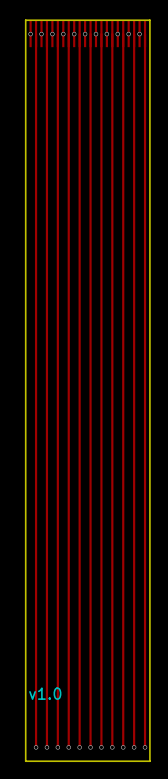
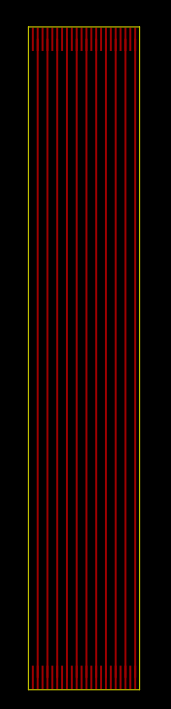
via: (30, 34) -> none
via: (41, 34) -> none
via: (52, 34) -> none
via: (63, 34) -> none
via: (74, 34) -> none
via: (85, 34) -> none
via: (95, 34) -> none
via: (106, 34) -> none
via: (117, 34) -> none
via: (128, 34) -> none
via: (139, 34) -> none
text: v1.0 (45, 693) -> none
via: (36, 747) -> none
via: (46, 747) -> none
via: (57, 747) -> none
via: (68, 747) -> none
via: (79, 747) -> none
part: none -> (84, 677)
via: (90, 747) -> none
via: (101, 747) -> none
via: (112, 747) -> none
via: (123, 747) -> none
via: (134, 747) -> none
via: (145, 747) -> none

